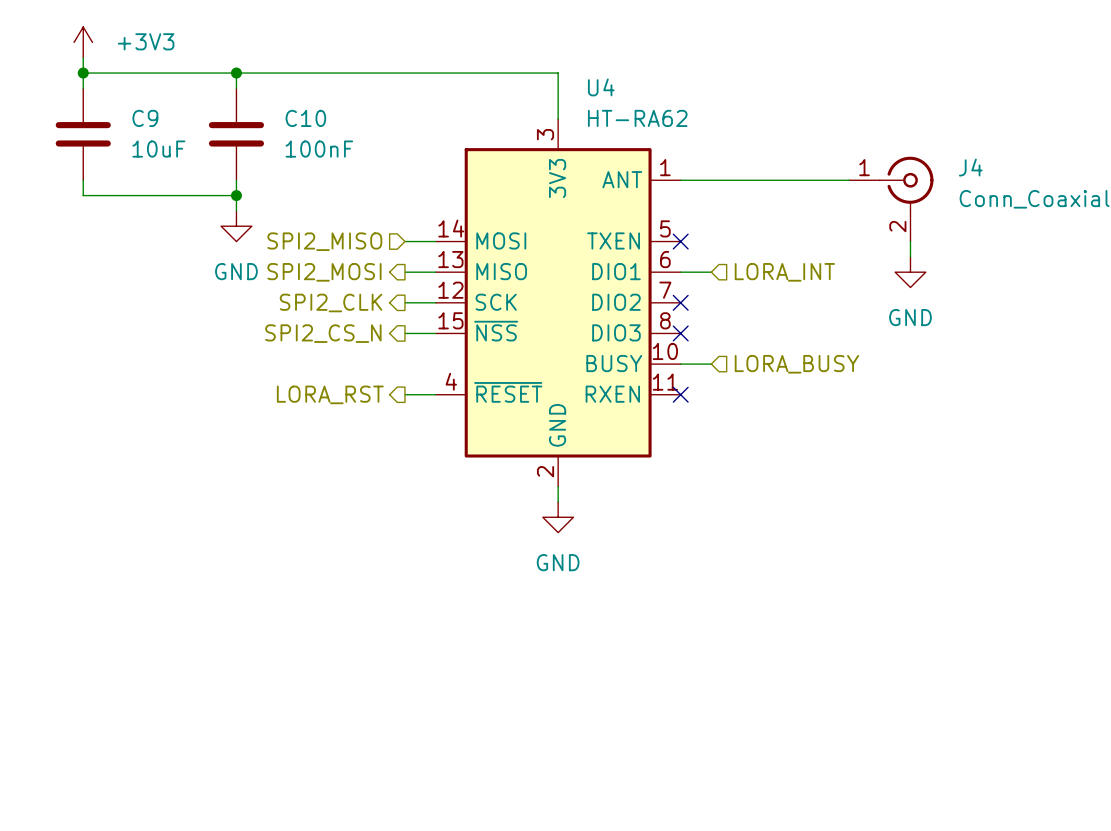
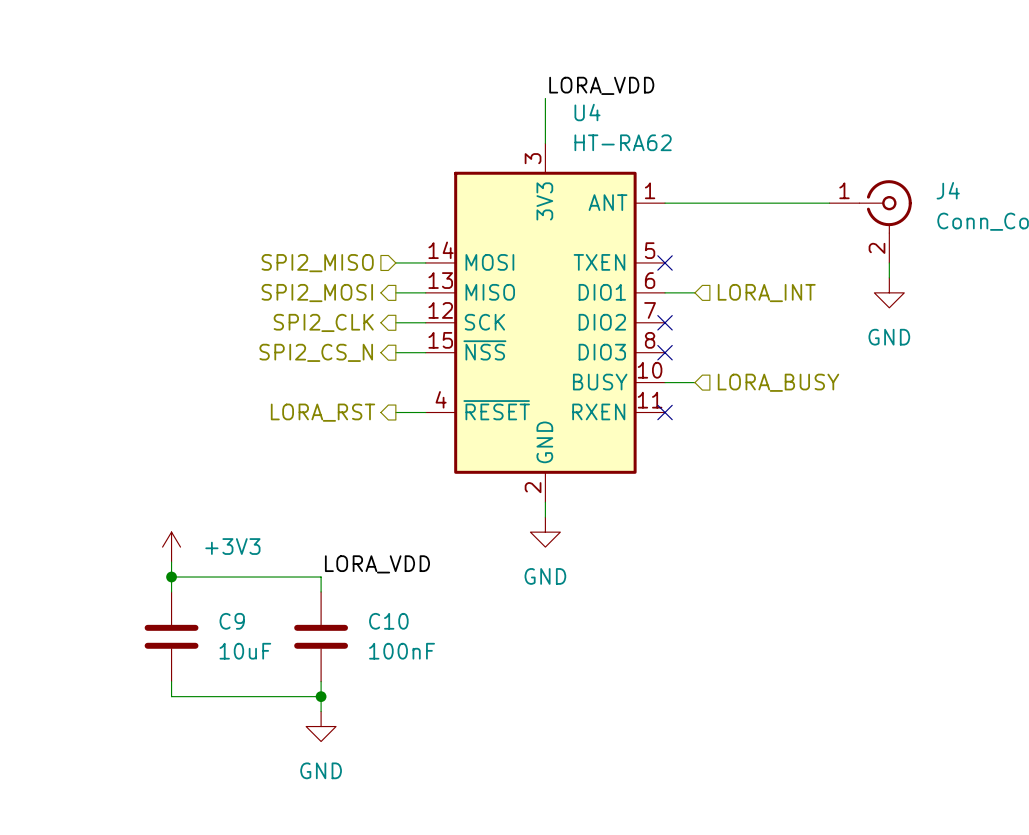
power symbol: +3V3 (83, 42) -> none
wire: (83, 57) (83, 88) -> none
label: none -> LORA_VDD (601, 85)
wire: (83, 73) (558, 73) -> none
junction: (83, 73) -> none
wire: (236, 73) (236, 88) -> none
junction: (236, 73) -> none
C9 position: (83, 134) -> (171, 636)
C10 position: (236, 134) -> (321, 636)
wire: (83, 180) (83, 195) (236, 195) -> none
wire: (236, 180) (236, 210) -> none
junction: (236, 195) -> none
power symbol: GND (236, 226) -> none
power symbol: none -> +3V3 (171, 547)
wire: none -> (171, 562) (171, 591)
label: none -> LORA_VDD (377, 564)
wire: none -> (171, 577) (321, 577) (321, 591)
junction: none -> (171, 577)
wire: none -> (171, 681) (171, 696) (321, 696)
wire: none -> (321, 681) (321, 711)
junction: none -> (321, 696)
power symbol: none -> GND (321, 726)

